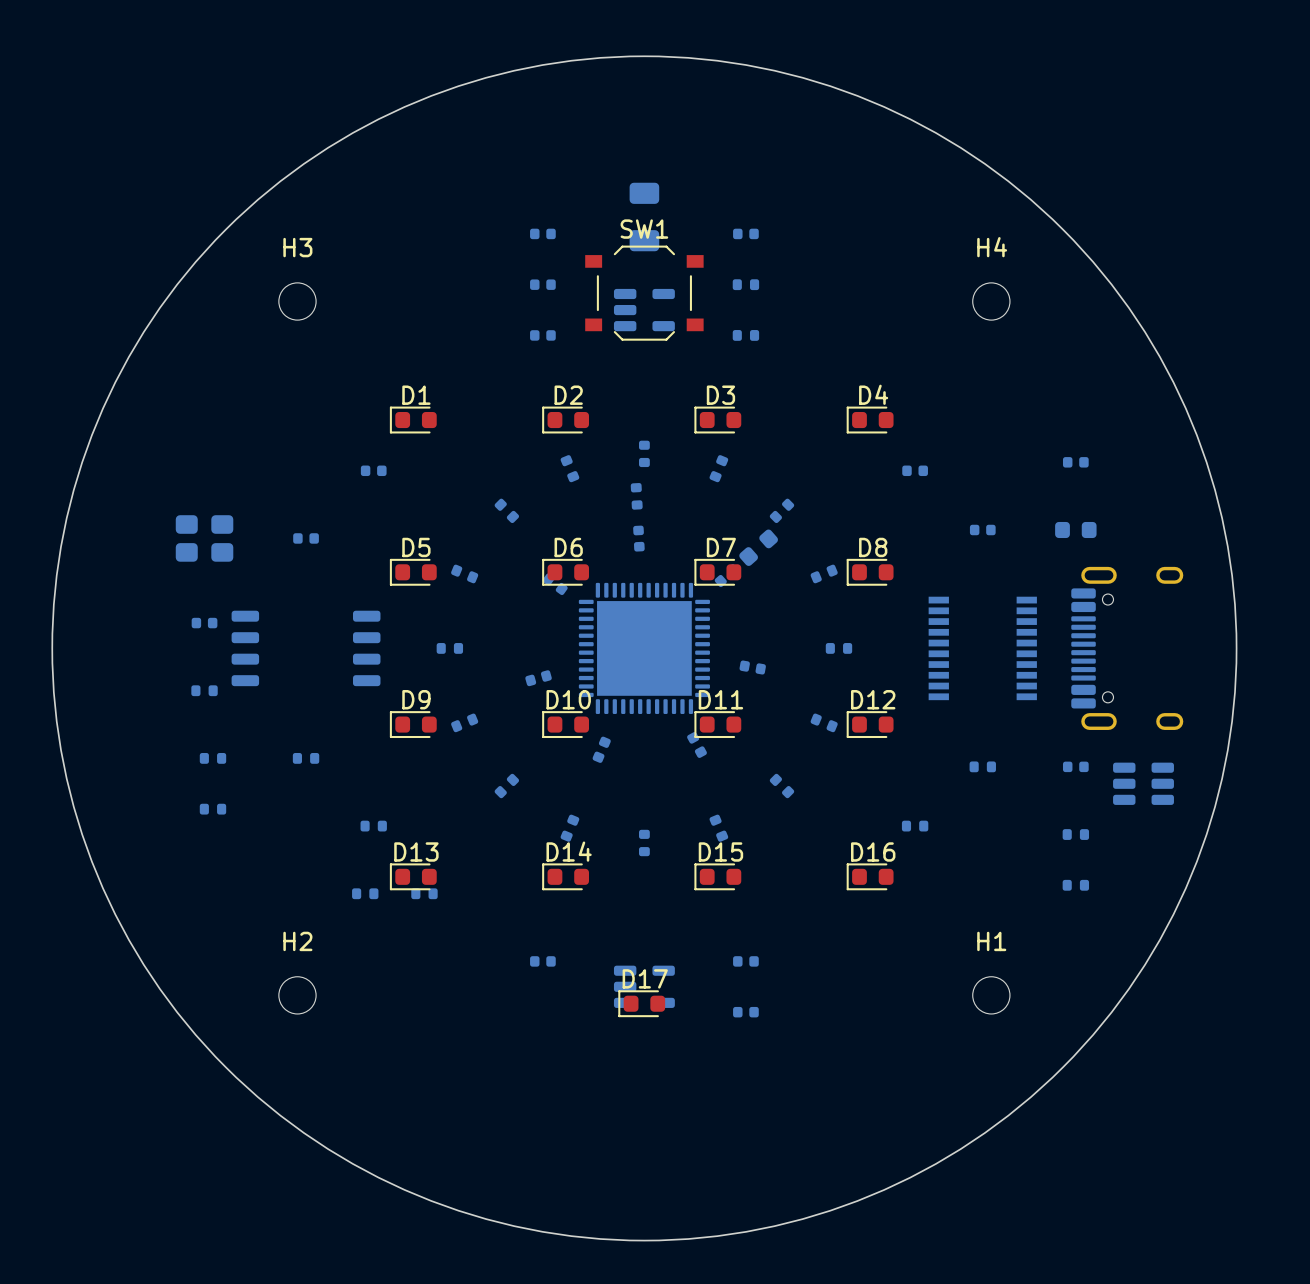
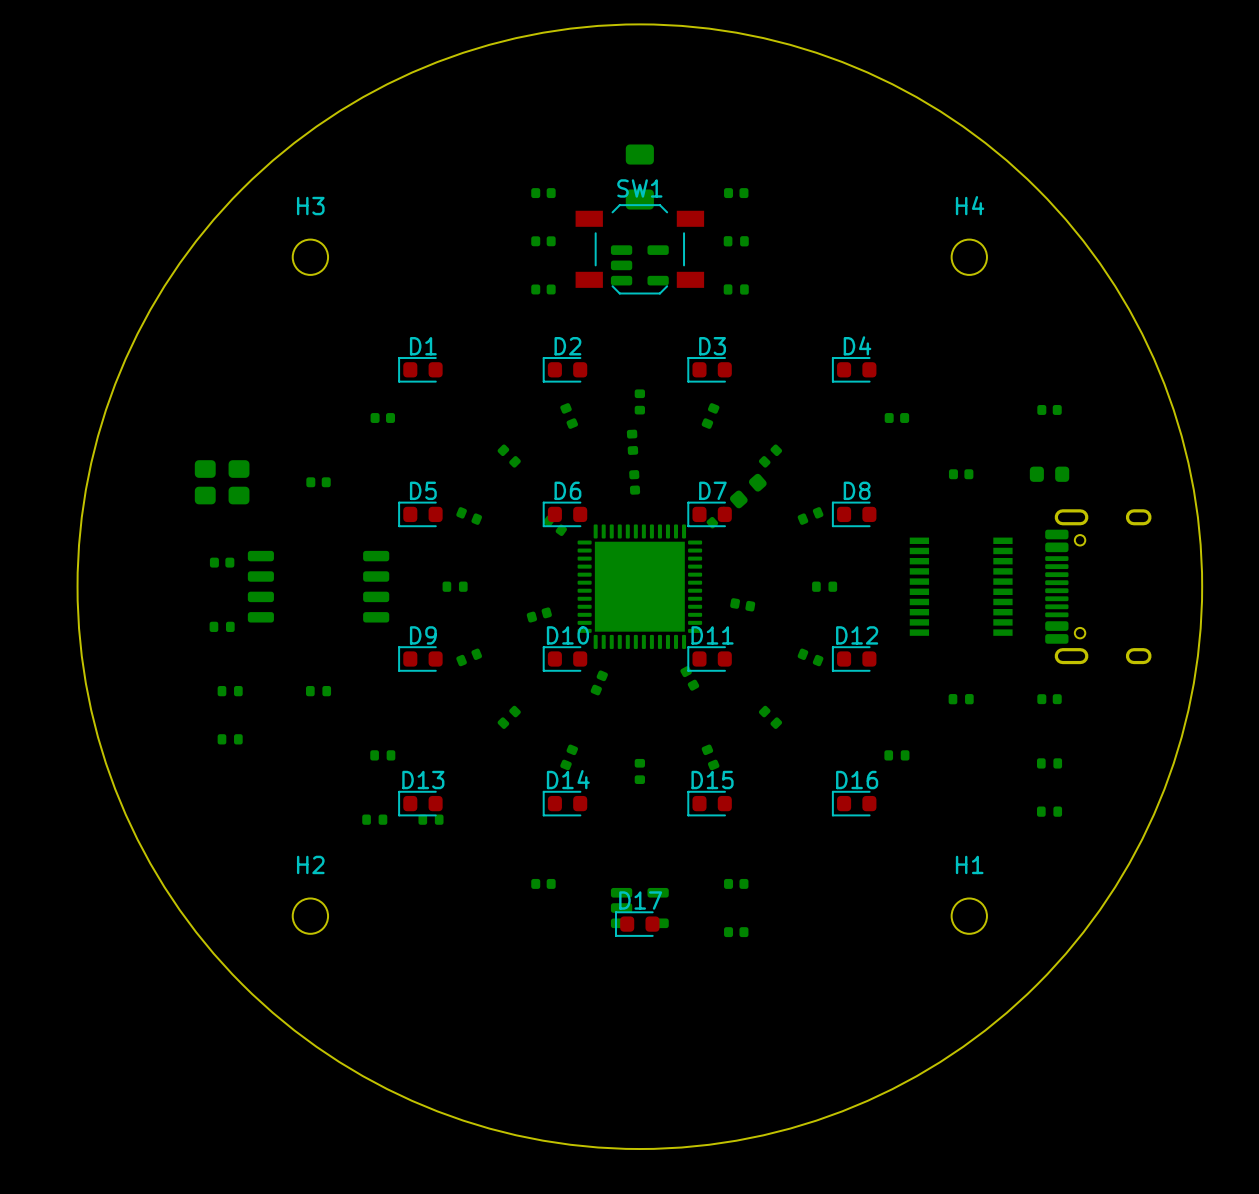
SW1 footprint: [585, 245, 704, 341] -> [575, 204, 705, 295]
part: (1143, 783) -> none

